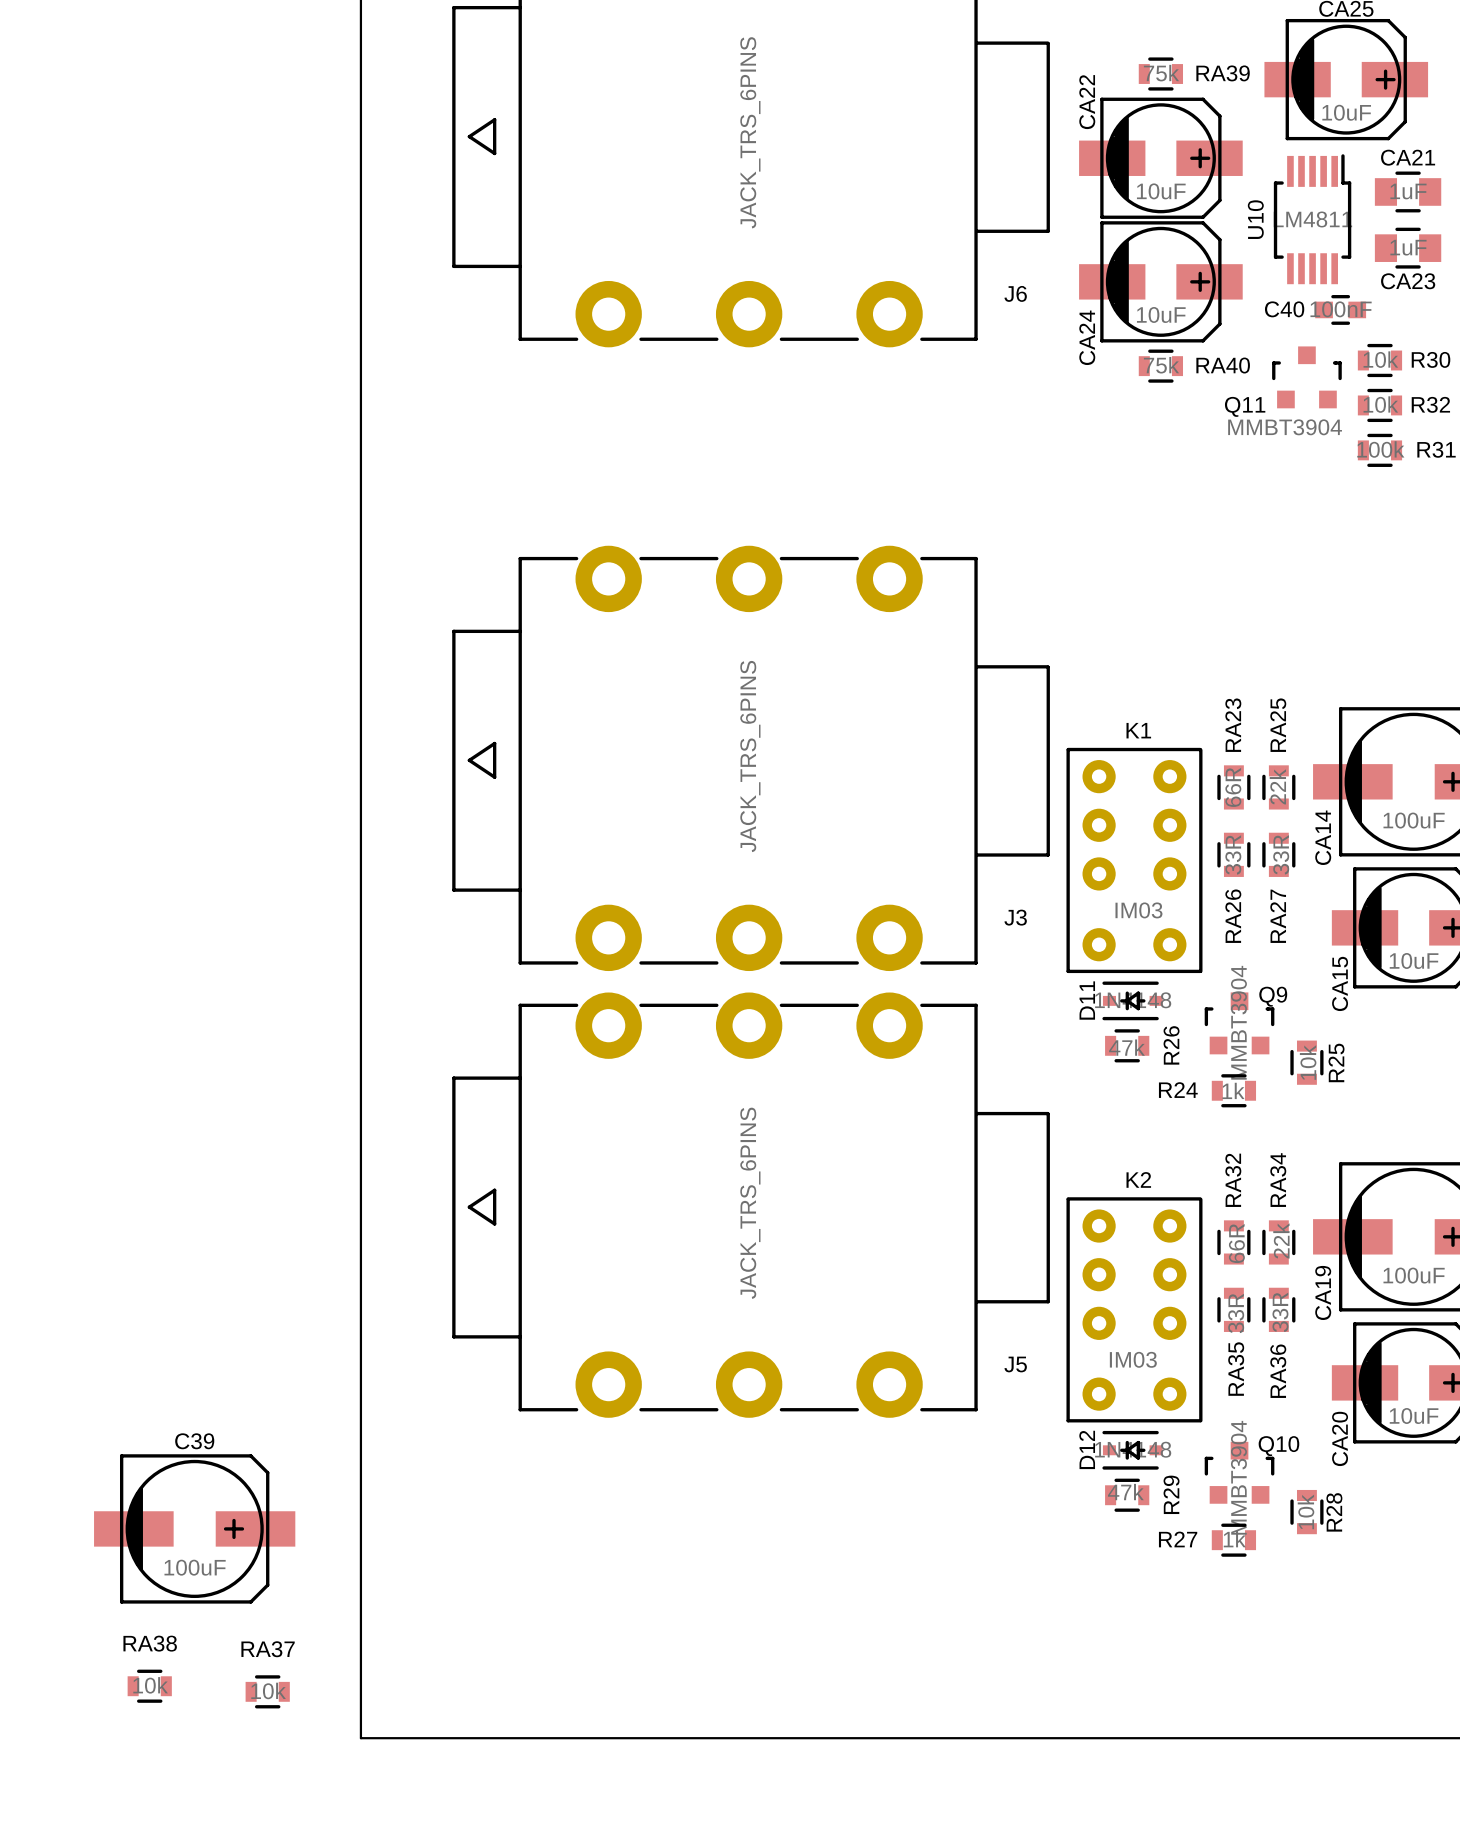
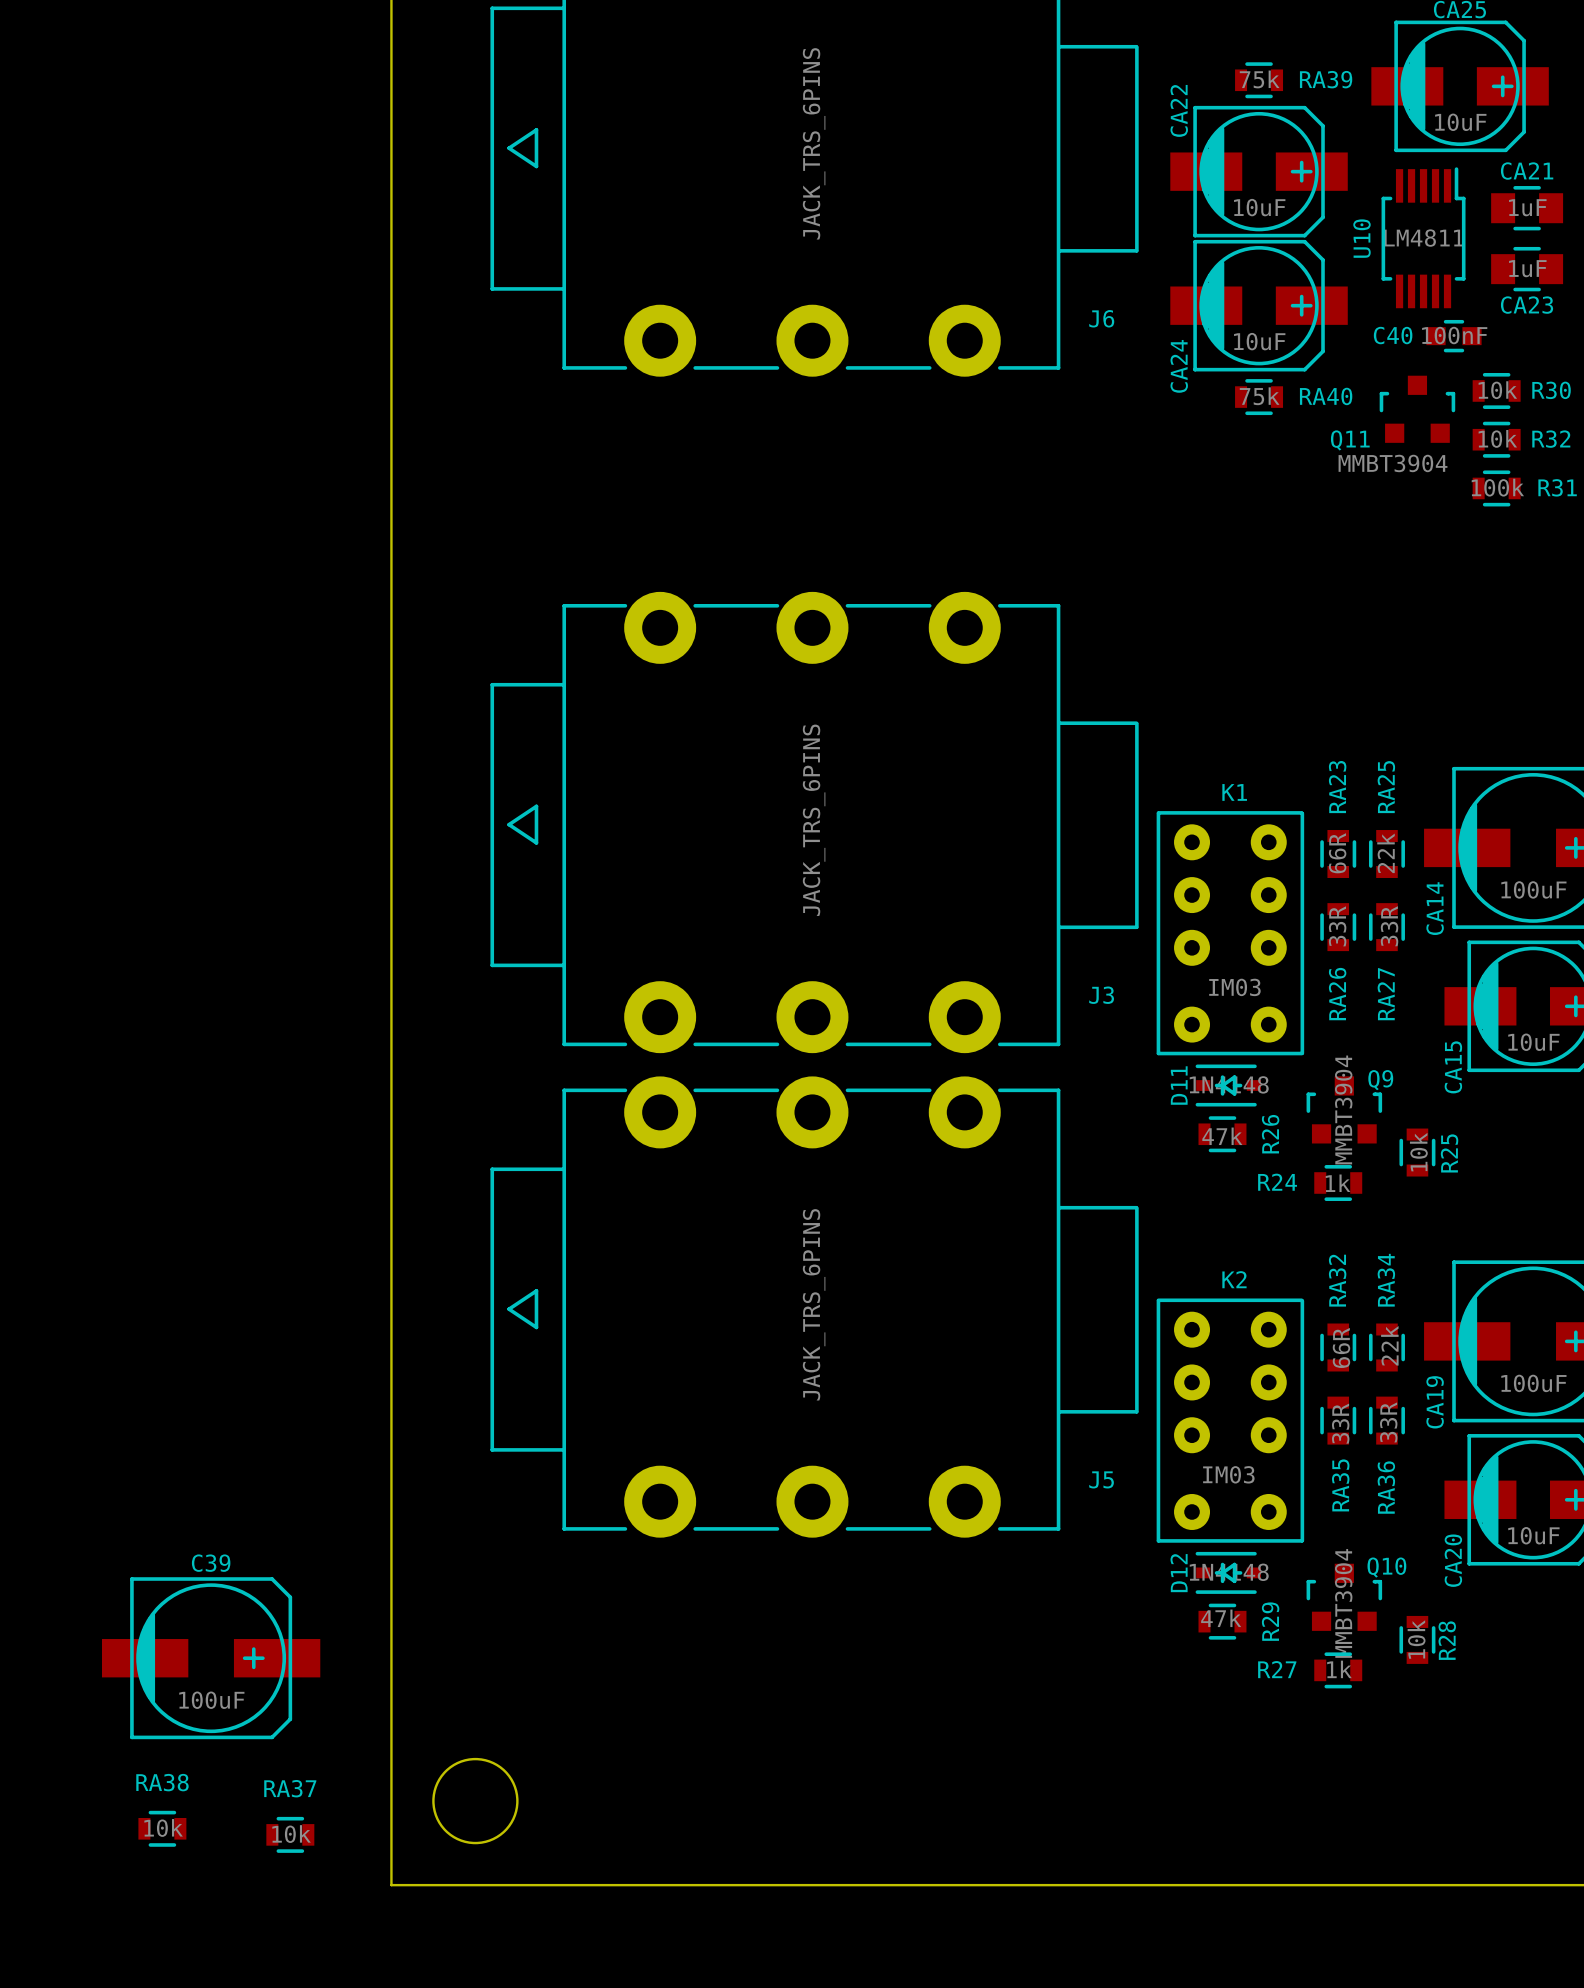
round board edge: none -> [432, 1757, 519, 1845]

